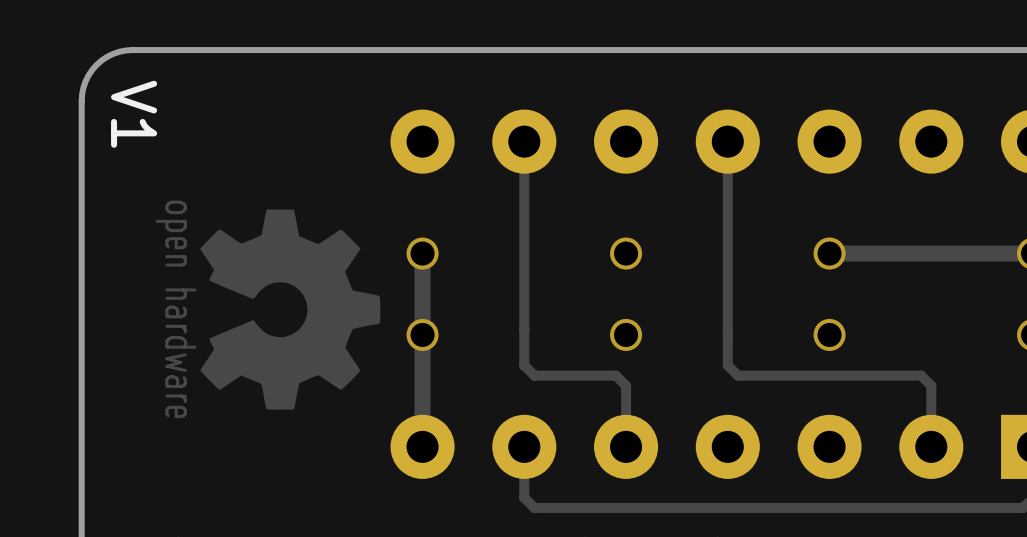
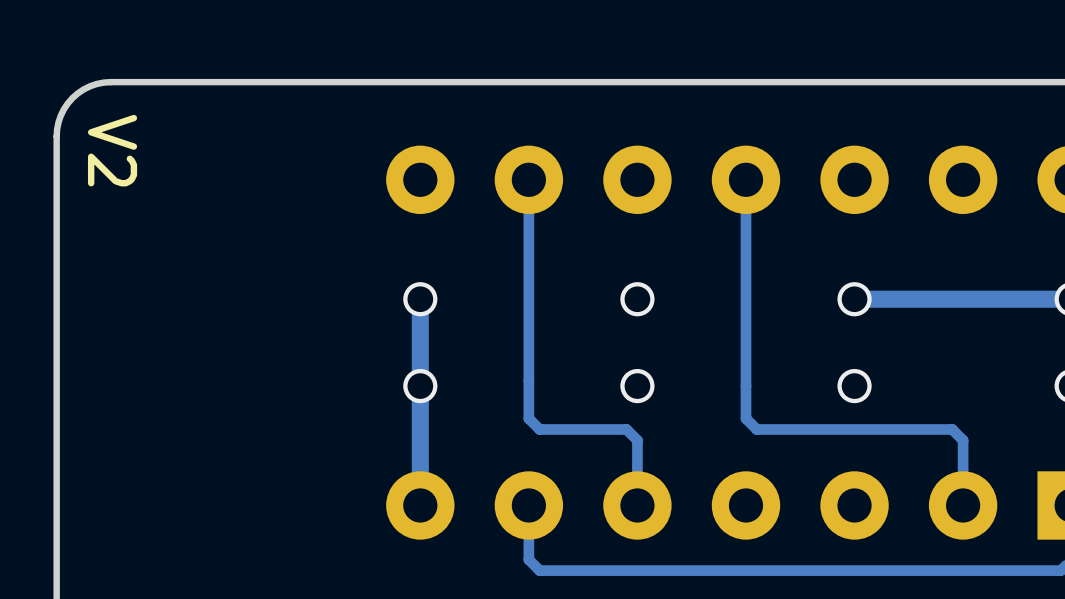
text: V1 (134, 114) -> V2 (112, 150)
drawing: [155, 200, 381, 418] -> none

